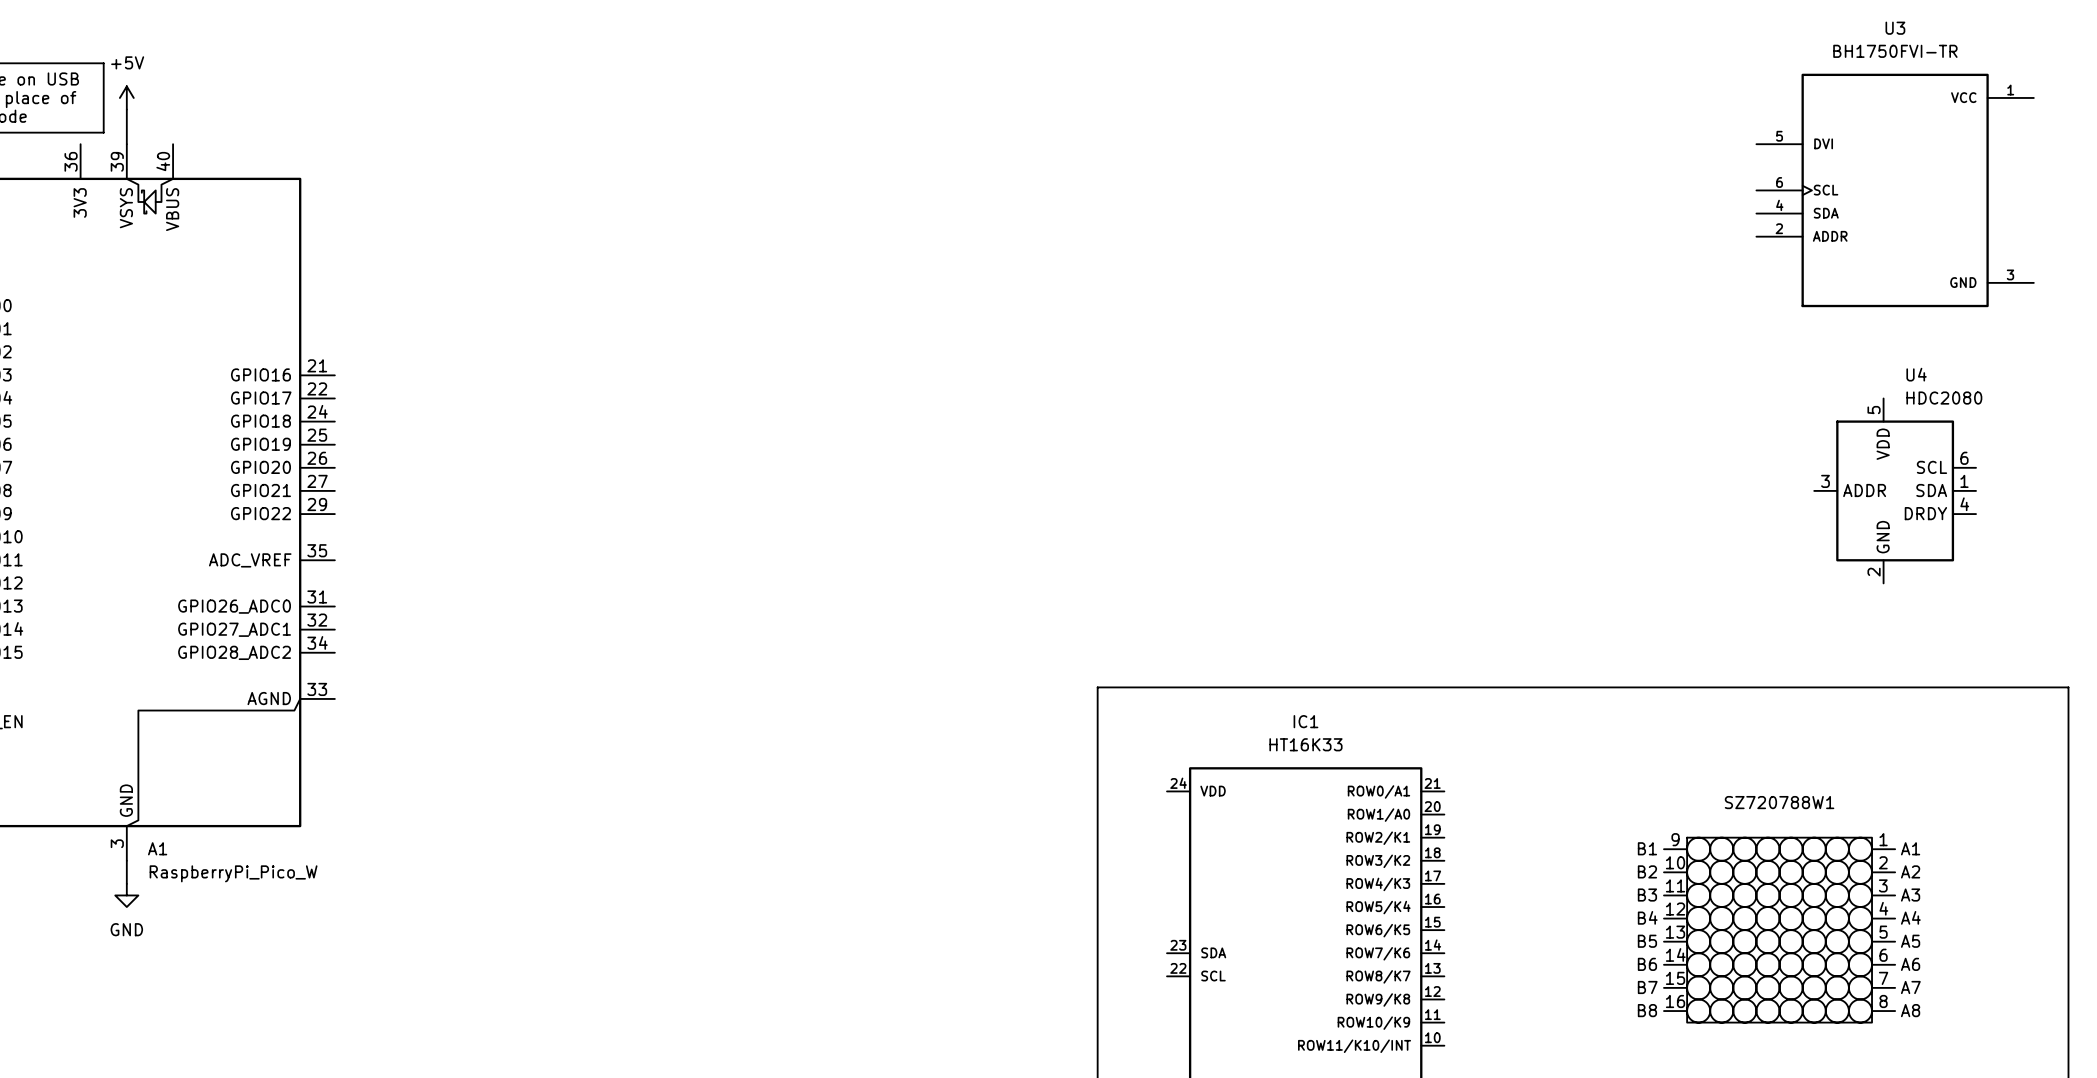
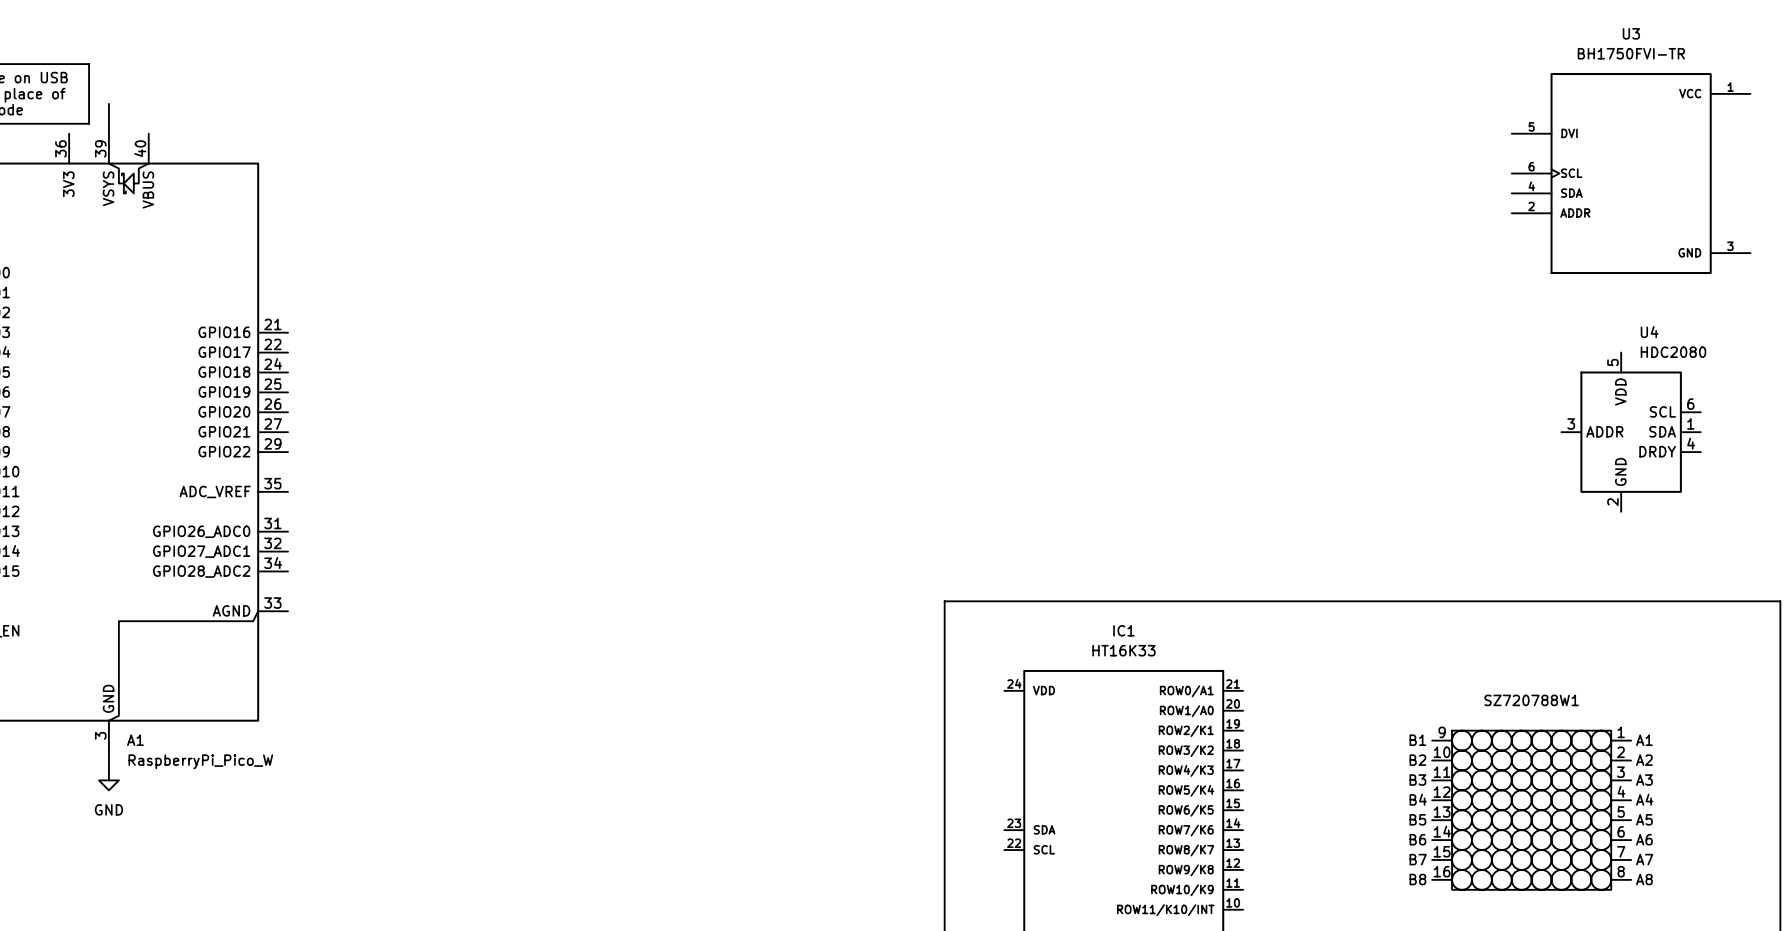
power symbol: +5V (126, 97) -> none

